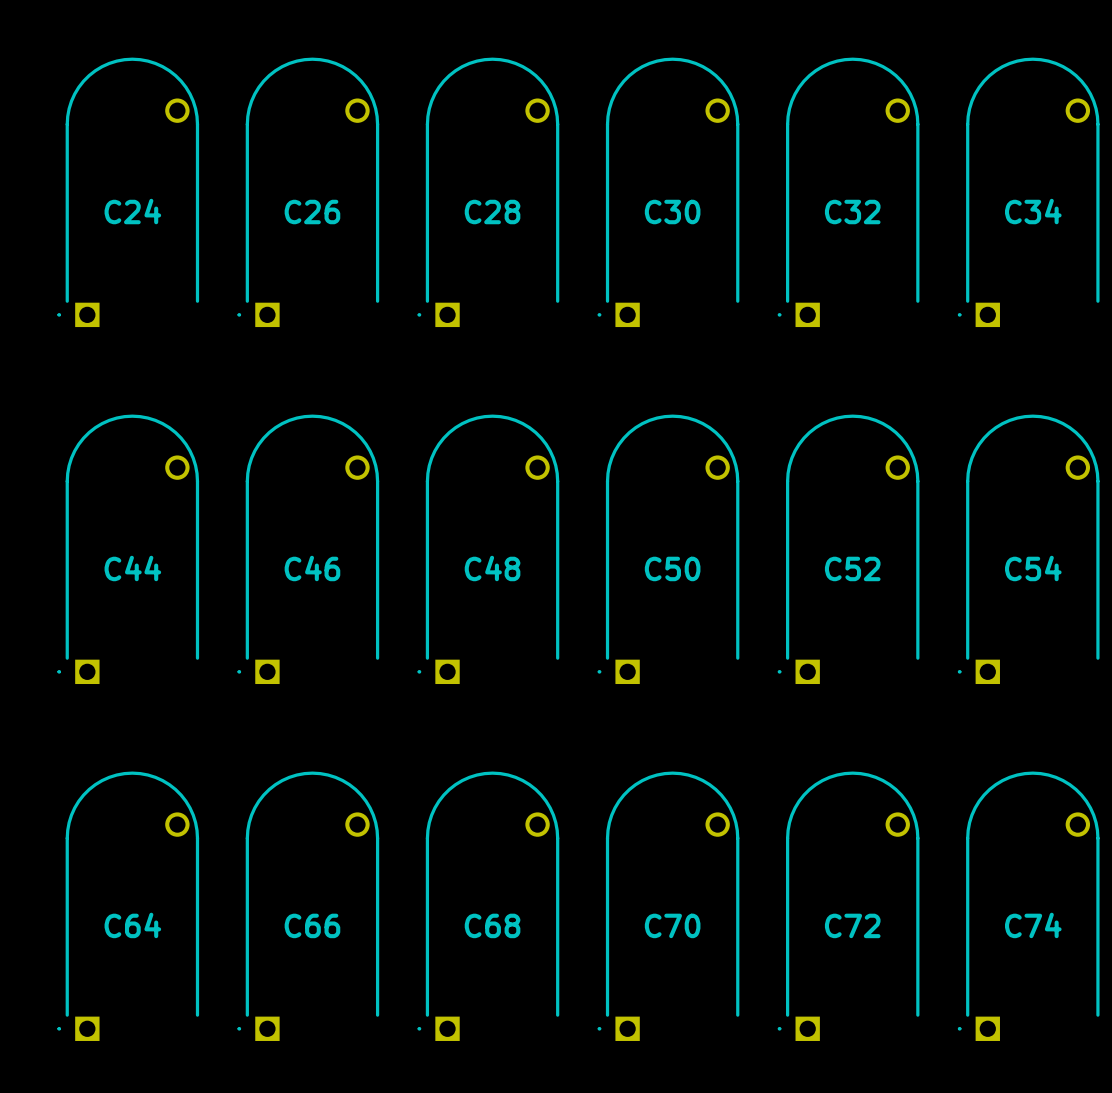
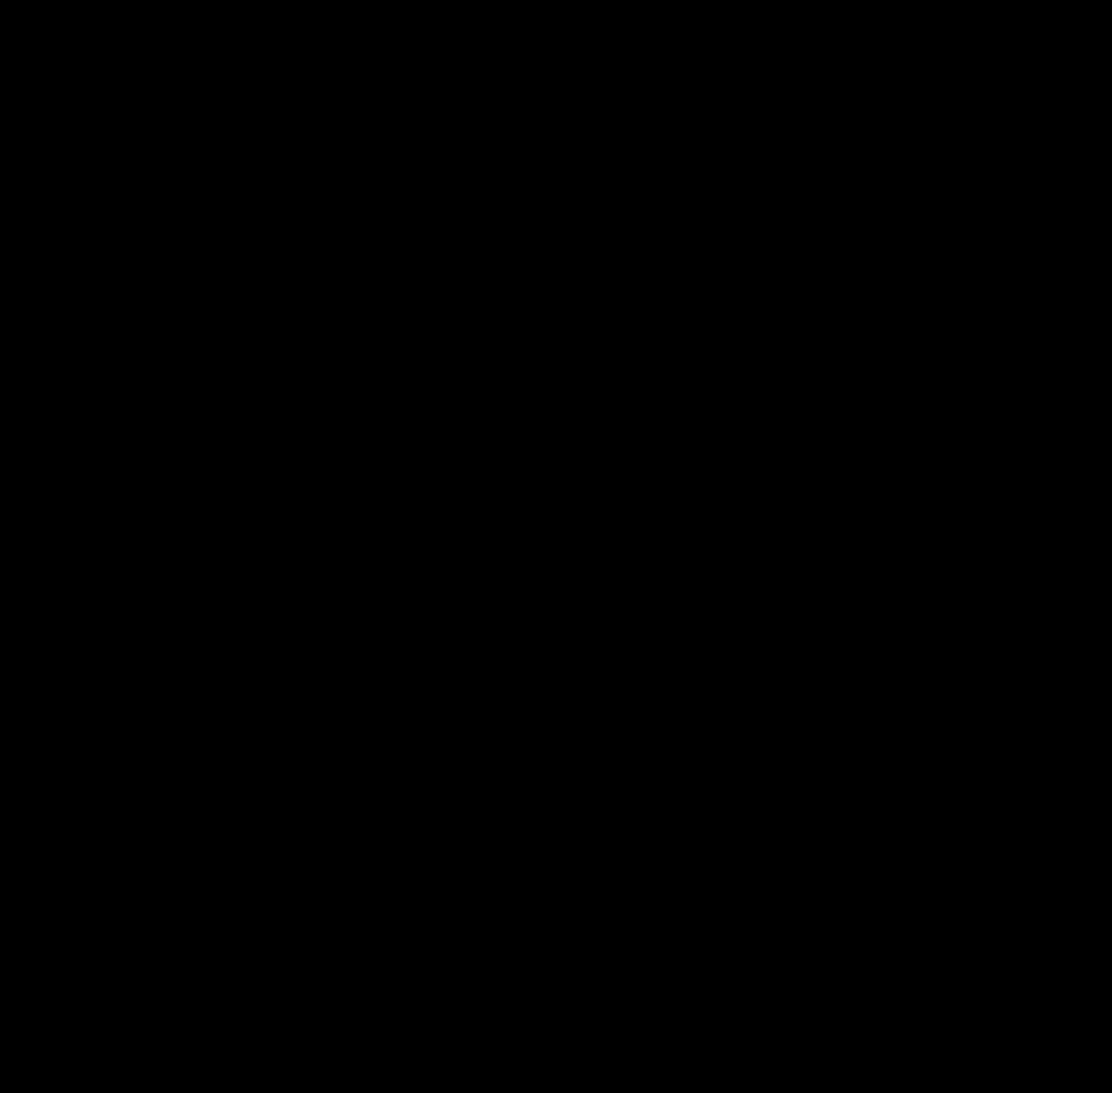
C24: (128, 192) -> none
C26: (308, 192) -> none
C28: (488, 192) -> none
C30: (668, 192) -> none
C32: (848, 192) -> none
C34: (1028, 192) -> none
C44: (128, 549) -> none
C46: (308, 549) -> none
C48: (488, 549) -> none
C50: (668, 549) -> none
C52: (848, 549) -> none
C54: (1028, 549) -> none
C64: (128, 906) -> none
C66: (308, 906) -> none
C68: (488, 906) -> none
C70: (668, 906) -> none
C72: (848, 906) -> none
C74: (1028, 906) -> none

